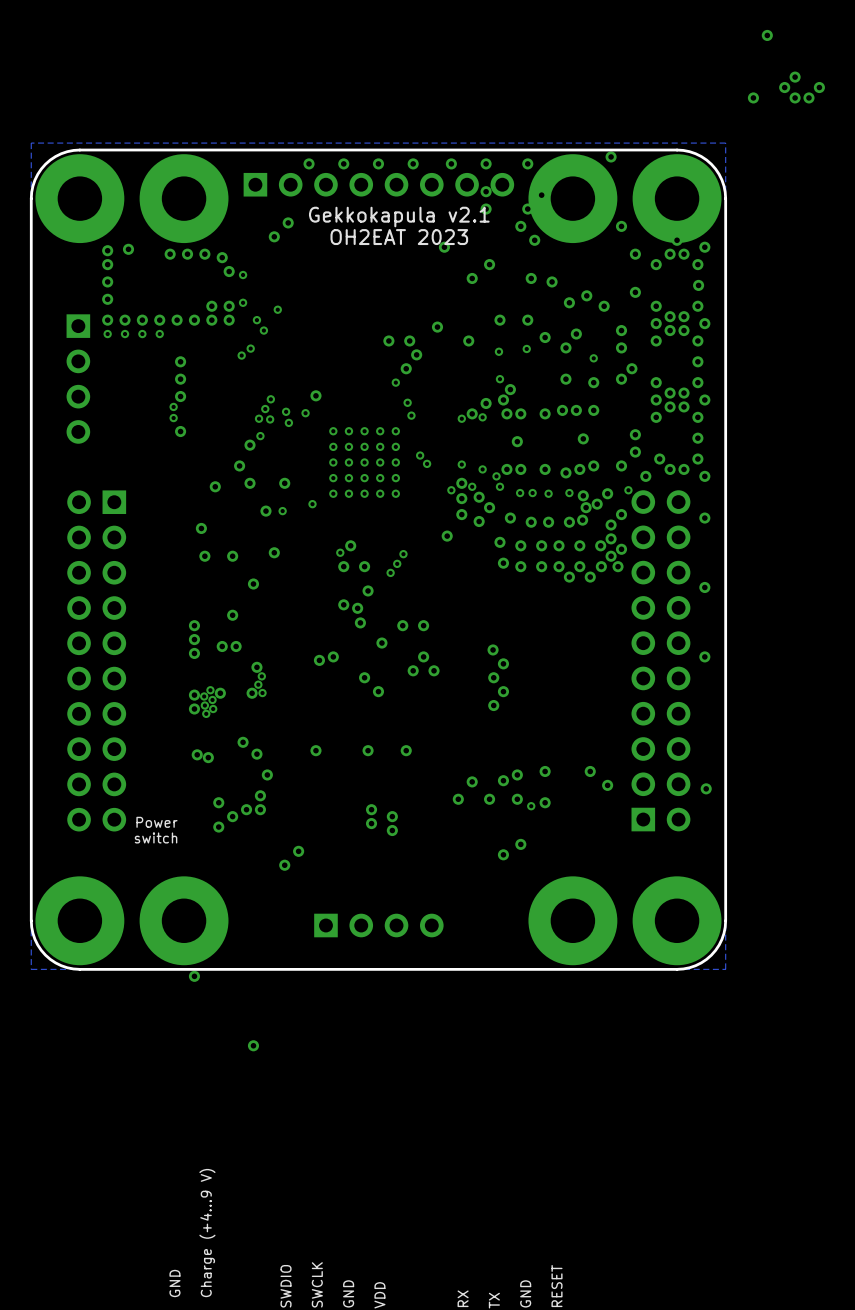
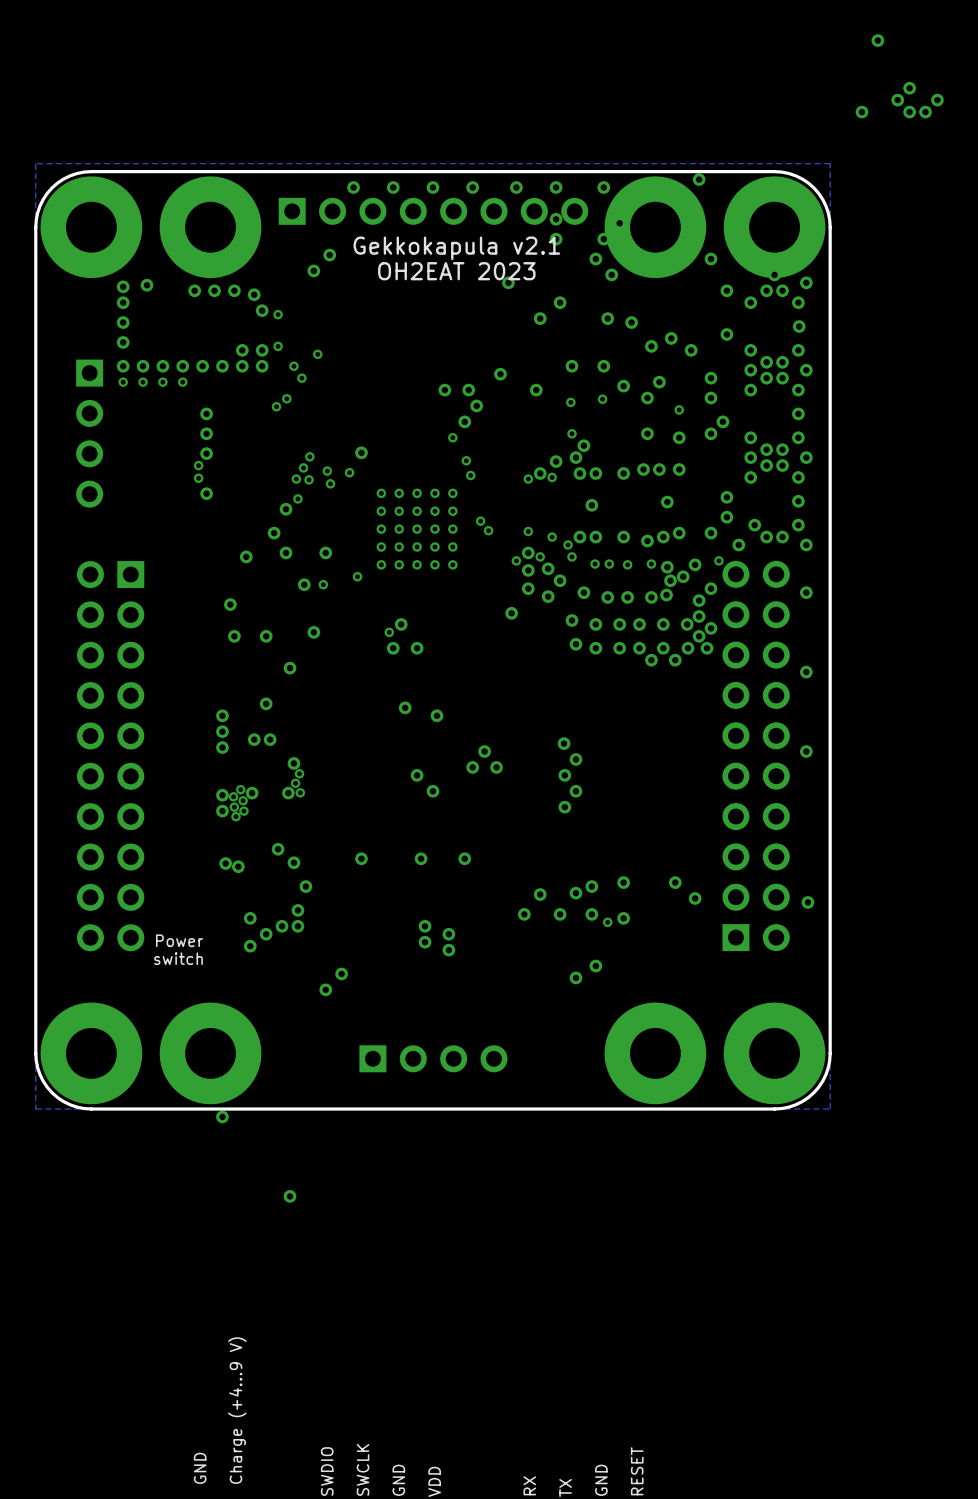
via: (403, 554) -> none
via: (397, 563) -> none
via: (390, 572) -> none
via: (368, 590) -> none
via: (343, 604) -> none
via: (357, 608) -> none
via: none -> (405, 707)
via: (360, 622) -> none
via: none -> (436, 715)
via: (402, 625) -> none
via: (423, 625) -> none
via: (381, 643) -> none
via: (333, 656) -> none
via: (319, 660) -> none

